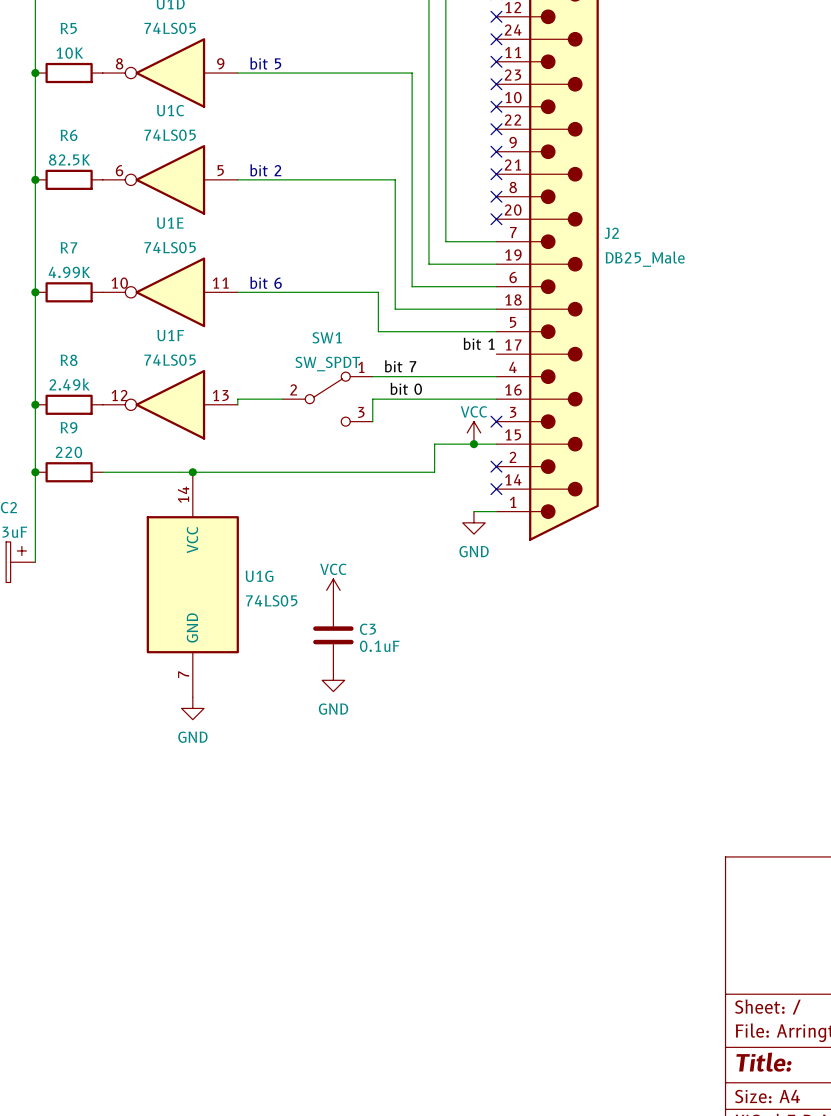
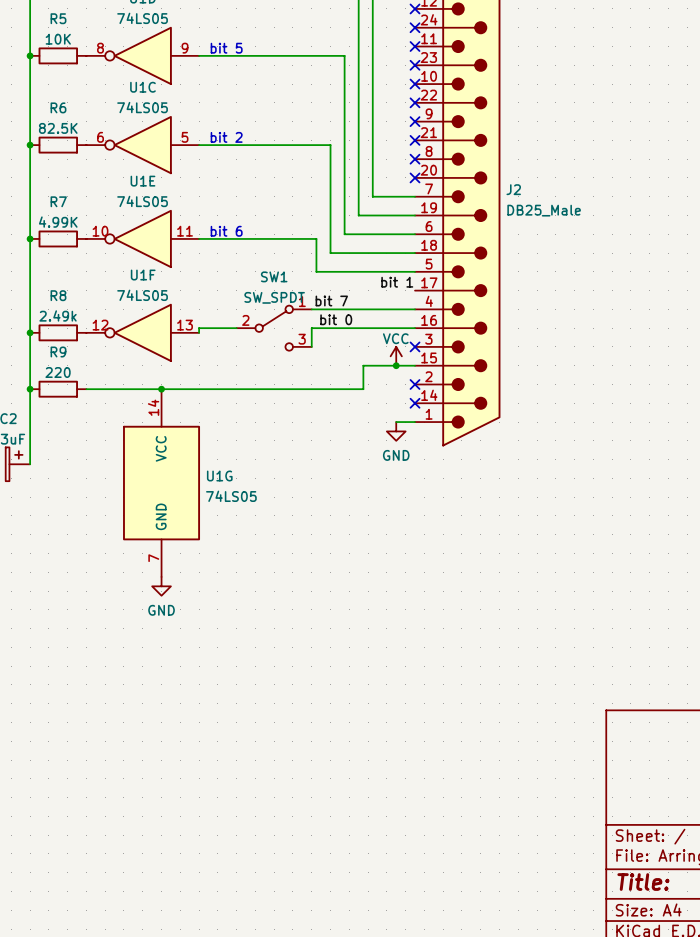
power symbol: VCC (333, 590) -> none
C3: 0.1uF (333, 635) -> none
power symbol: GND (333, 680) -> none

